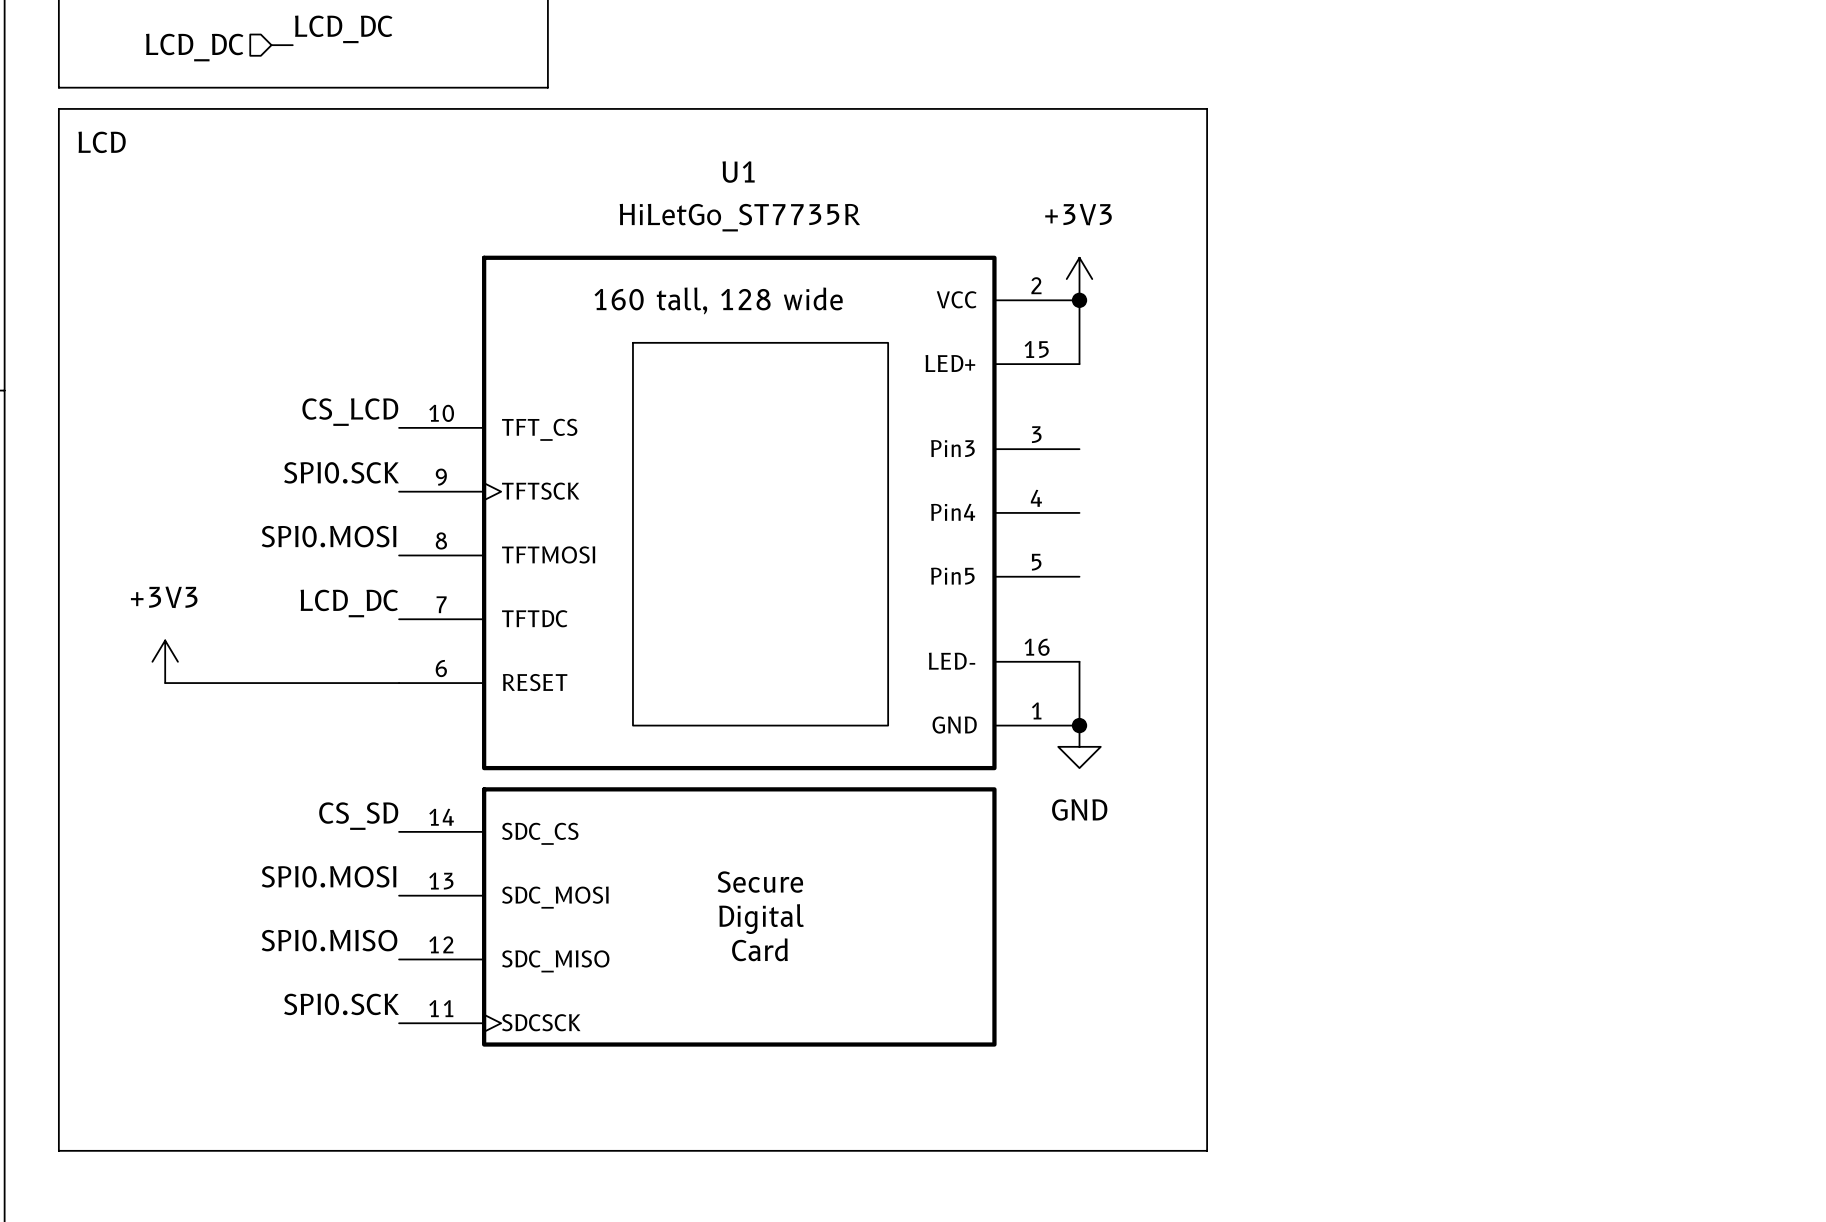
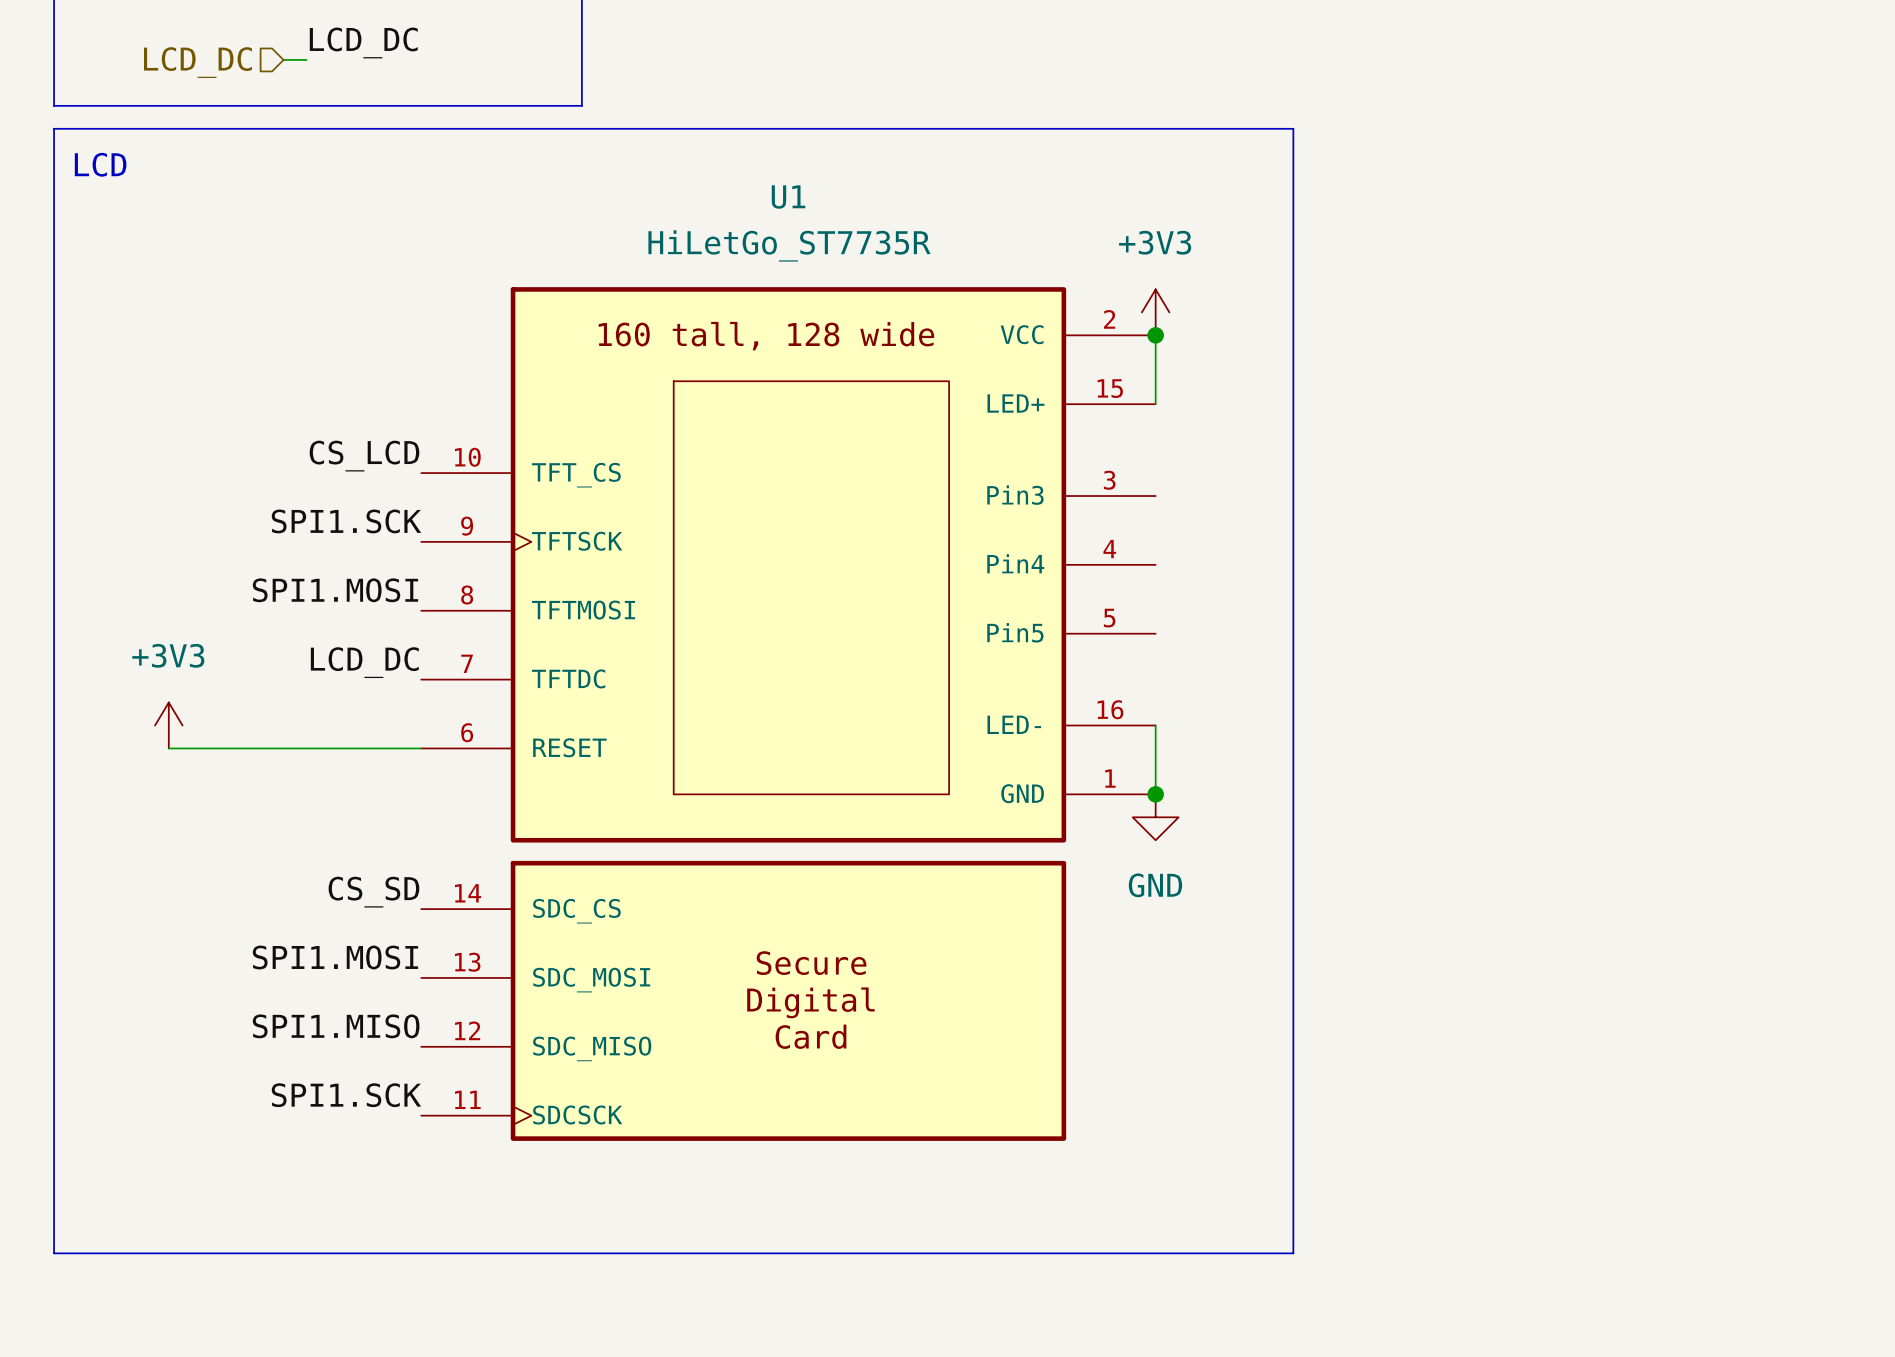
label: SPI0.SCK (341, 472) -> SPI1.SCK (346, 521)
label: SPI0.MOSI (329, 536) -> SPI1.MOSI (335, 590)
label: SPI0.MOSI (329, 876) -> SPI1.MOSI (335, 957)
label: SPI0.MISO (329, 940) -> SPI1.MISO (336, 1026)
label: SPI0.SCK (341, 1004) -> SPI1.SCK (346, 1095)

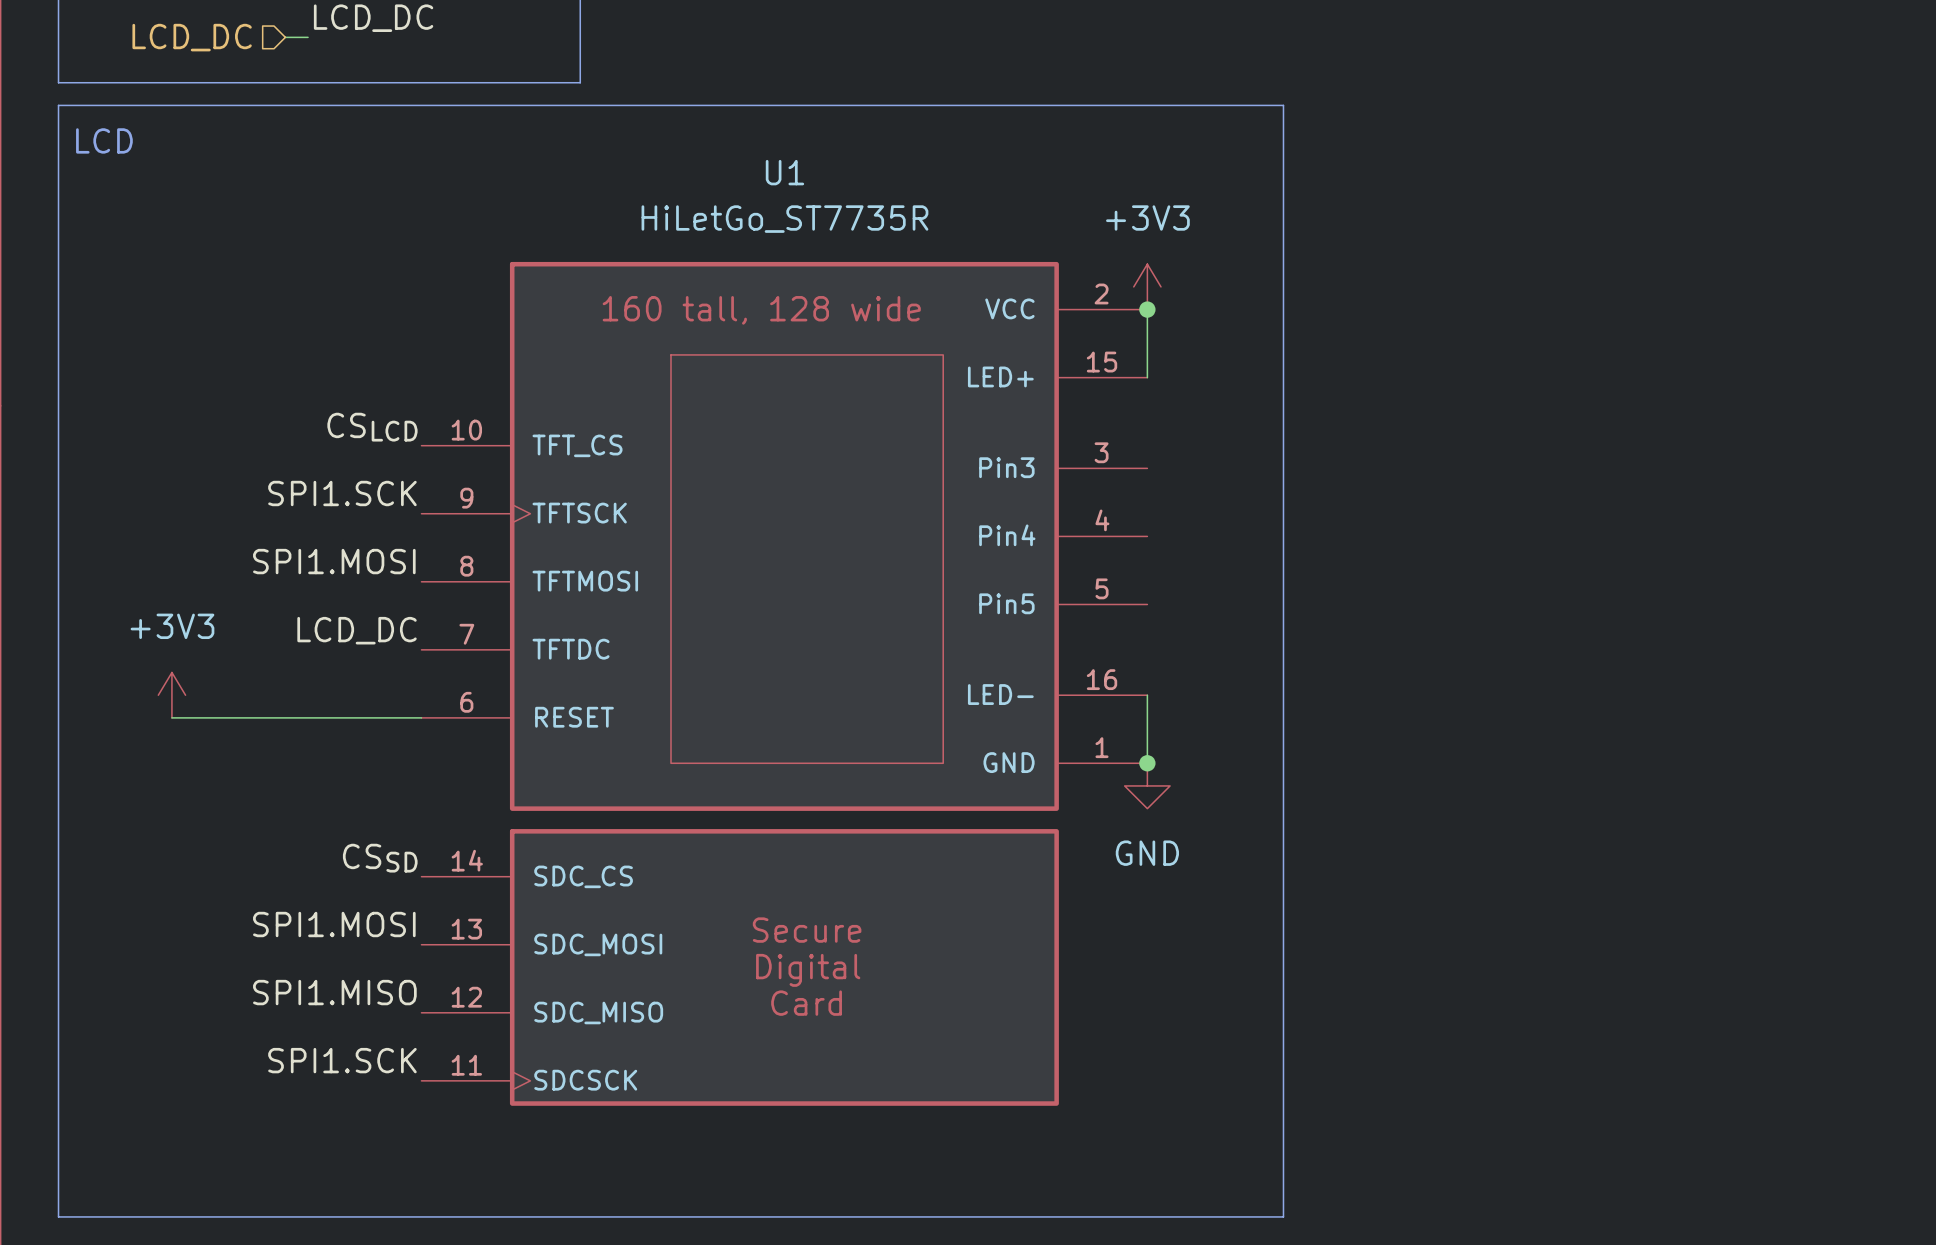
label: CS_LCD (364, 456) -> CSLCD (372, 427)
label: CS_SD (373, 892) -> CSSD (380, 858)

